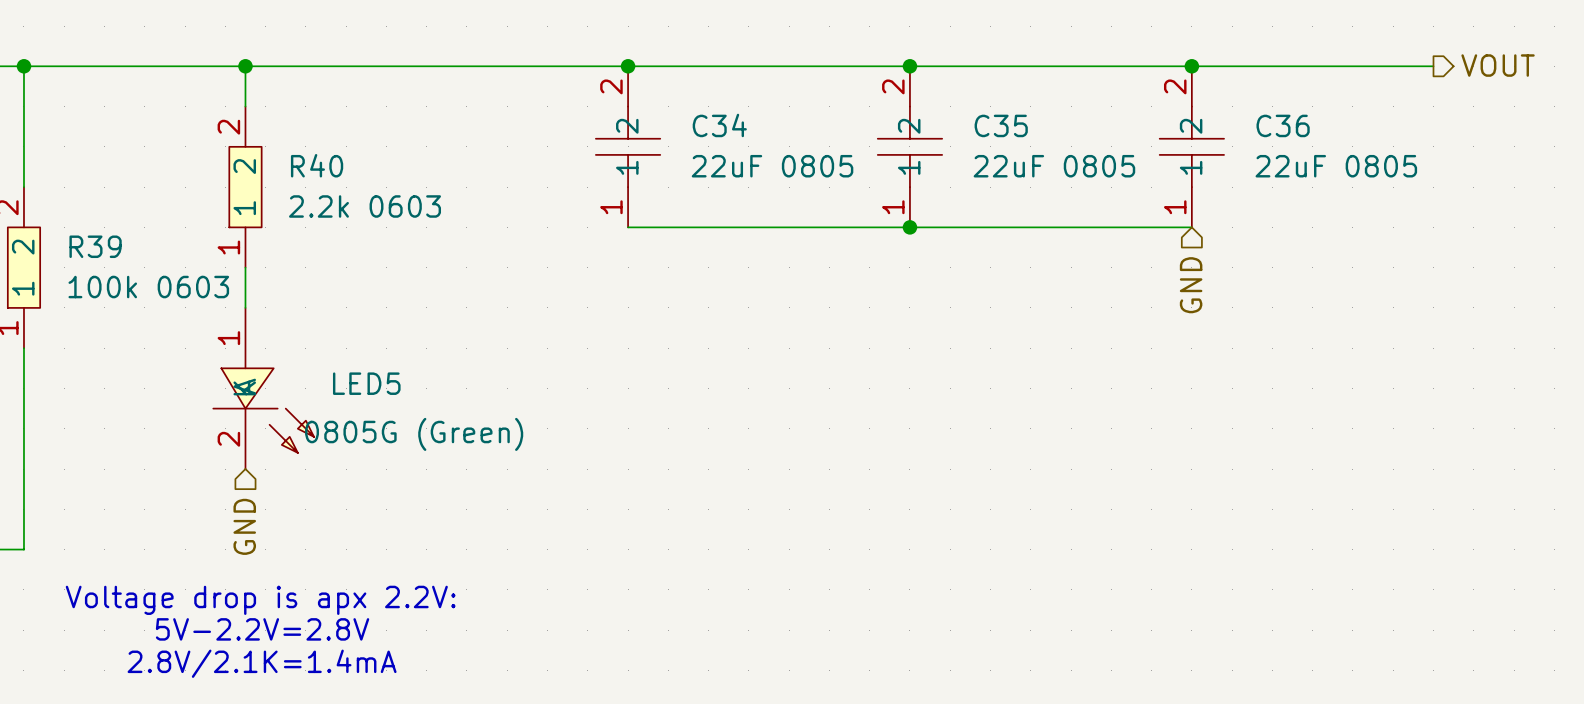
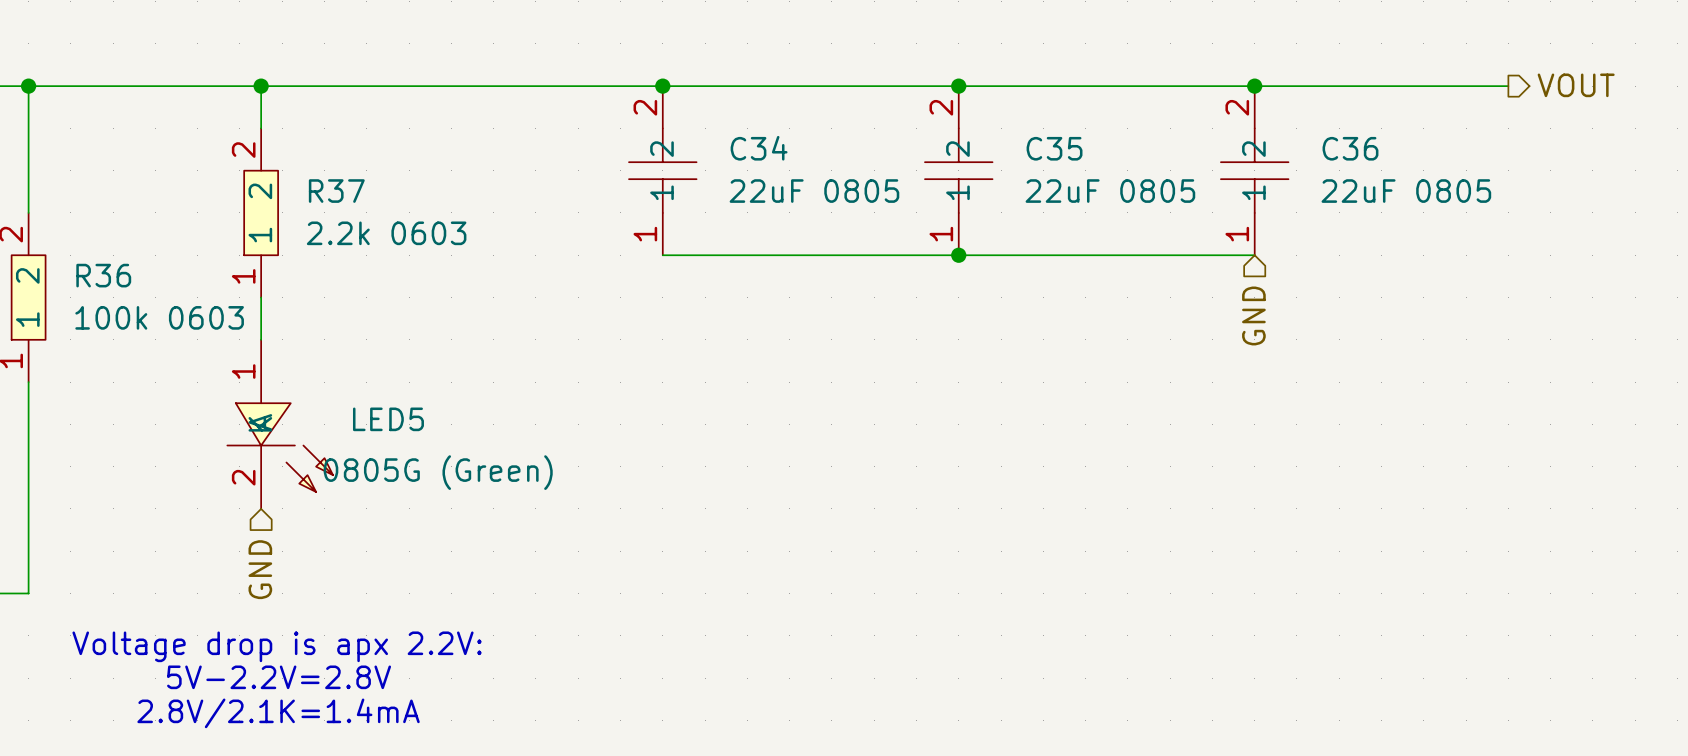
R40 name: R40 (317, 165) -> R37 (336, 191)
R39 name: R39 (95, 246) -> R36 (103, 275)

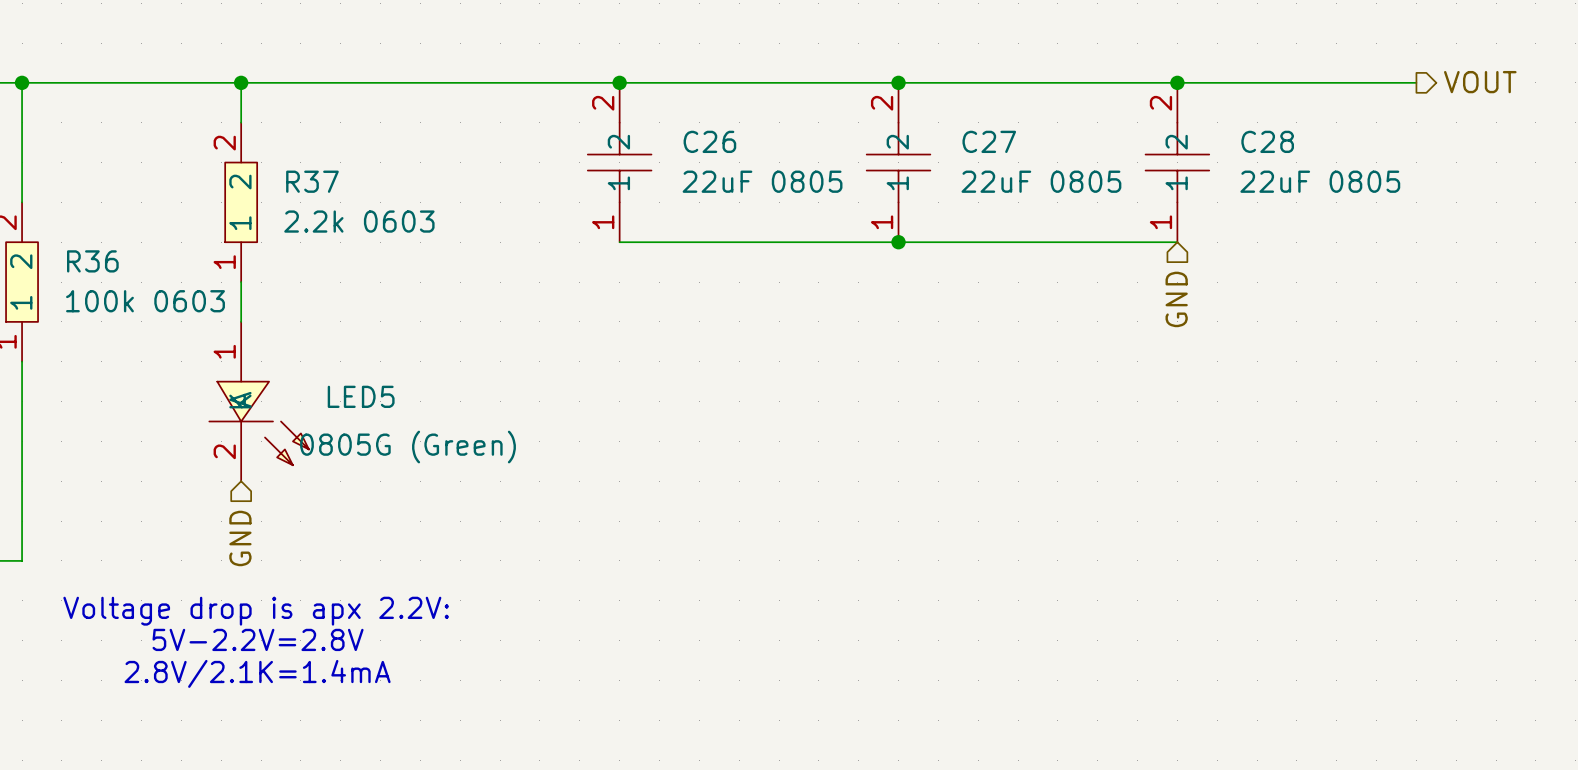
C34 name: C34 (759, 148) -> C26 (709, 141)
C35 name: C35 (1054, 148) -> C27 (989, 141)
C36 name: C36 (1350, 148) -> C28 (1267, 141)

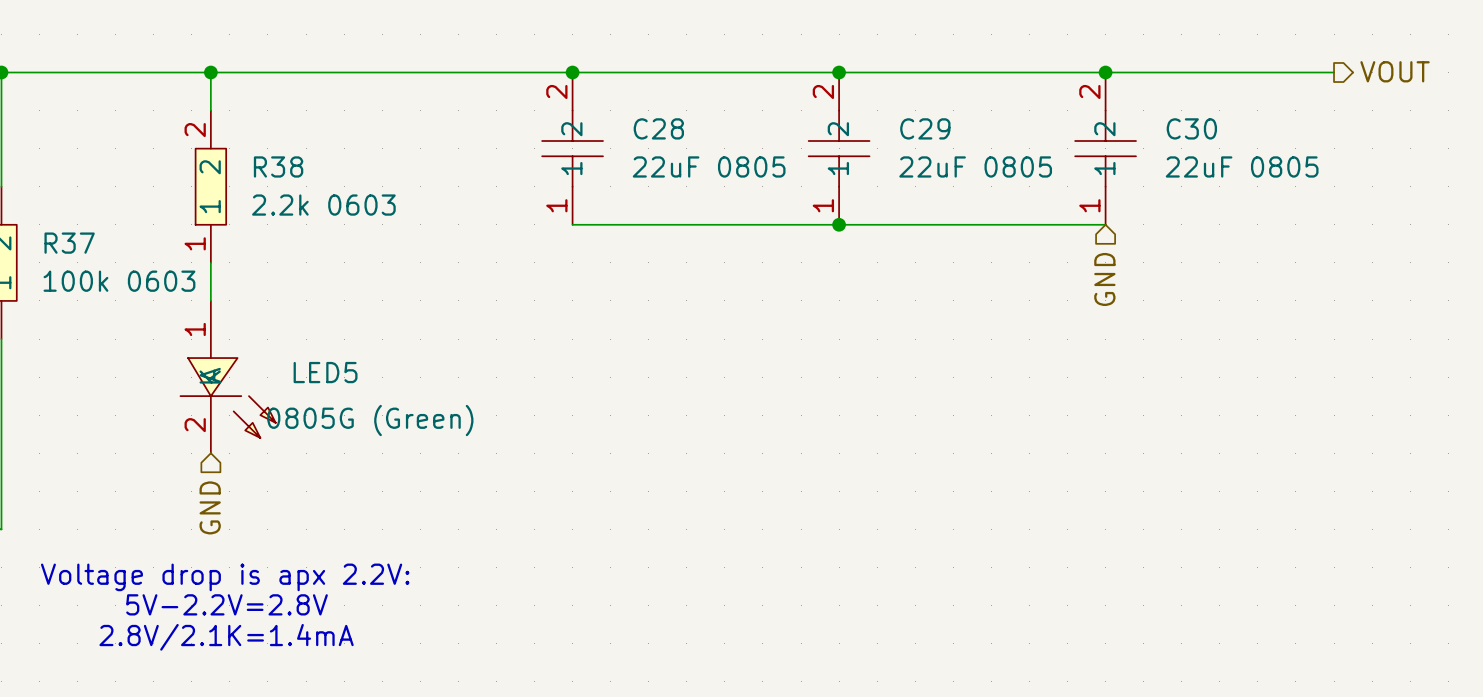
C26 name: C26 (709, 141) -> C28 (658, 128)
C27 name: C27 (989, 141) -> C29 (925, 128)
C28 name: C28 (1267, 141) -> C30 (1191, 128)
R37 name: R37 (312, 181) -> R38 (278, 166)
R36 name: R36 (92, 261) -> R37 (69, 243)

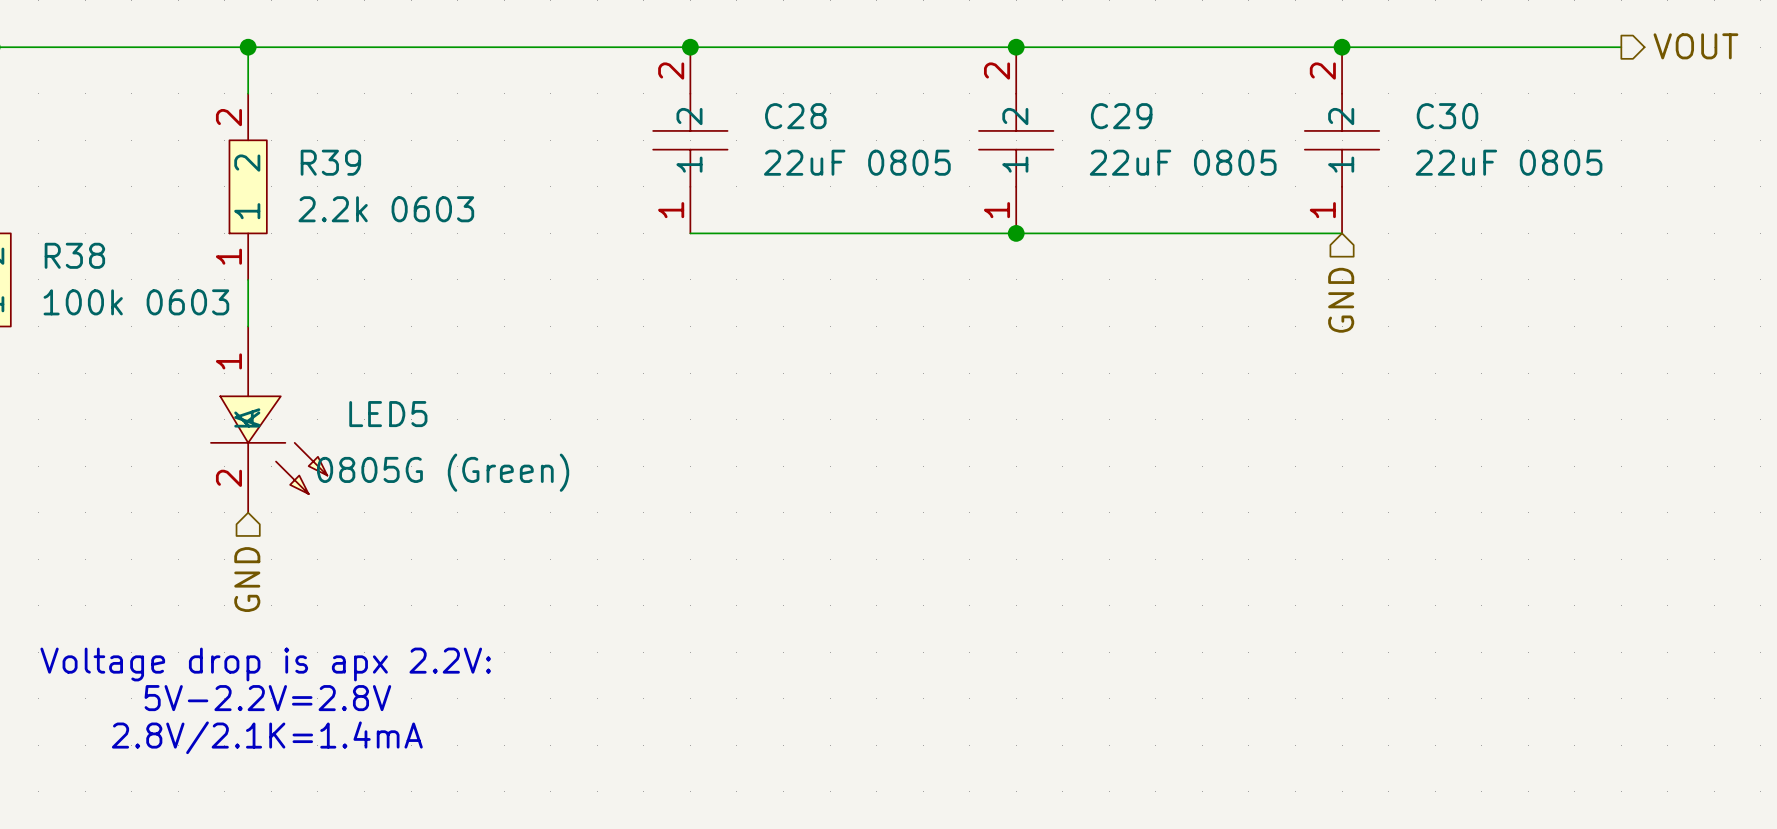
R38 name: R38 (278, 166) -> R39 (330, 162)
R37 name: R37 (69, 243) -> R38 (74, 255)

